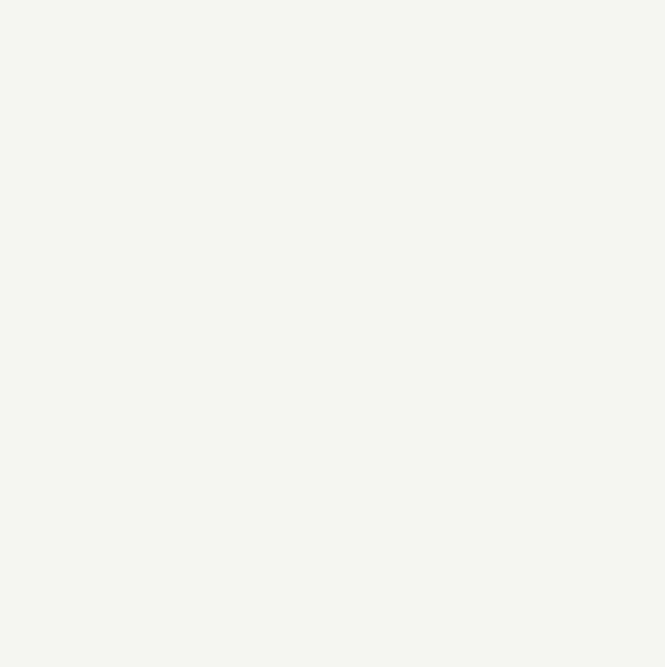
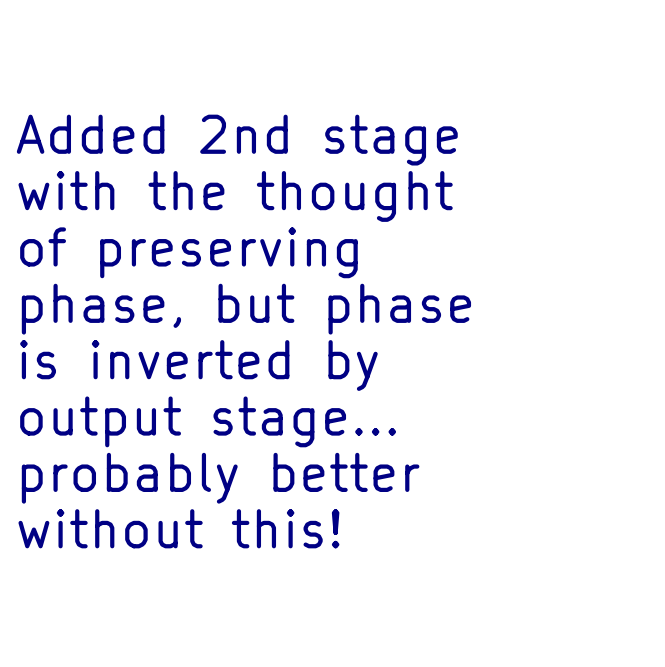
text: none -> Added 2nd stage (237, 140)
text: none -> with the thought (235, 196)
text: none -> of preserving (188, 252)
text: none -> phase, but phase (246, 309)
text: none -> is inverted by (198, 365)
text: none -> output stage... (208, 421)
text: none -> probably better (220, 478)
text: none -> without this! (178, 528)

